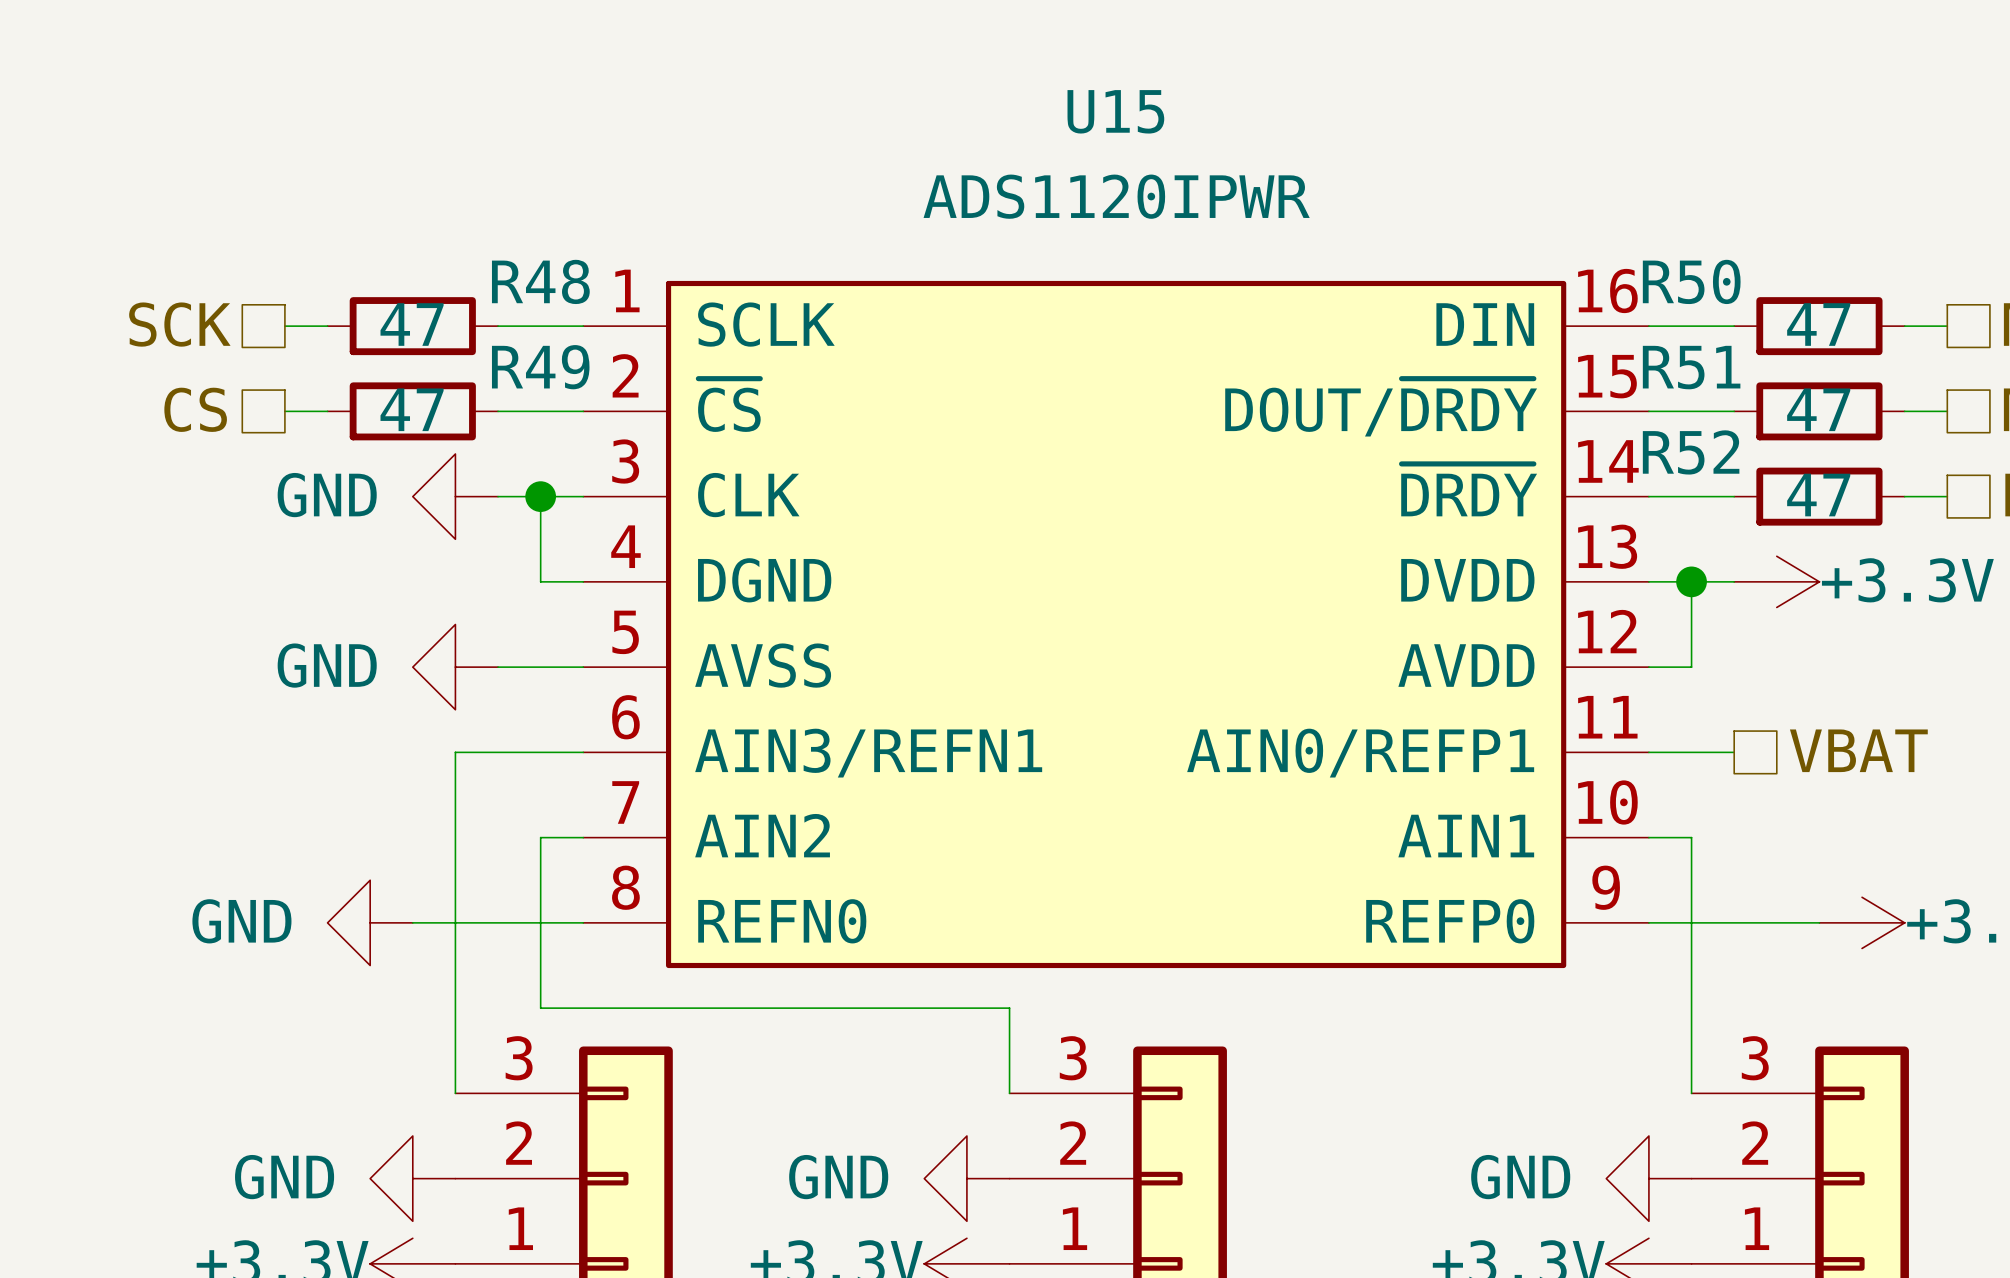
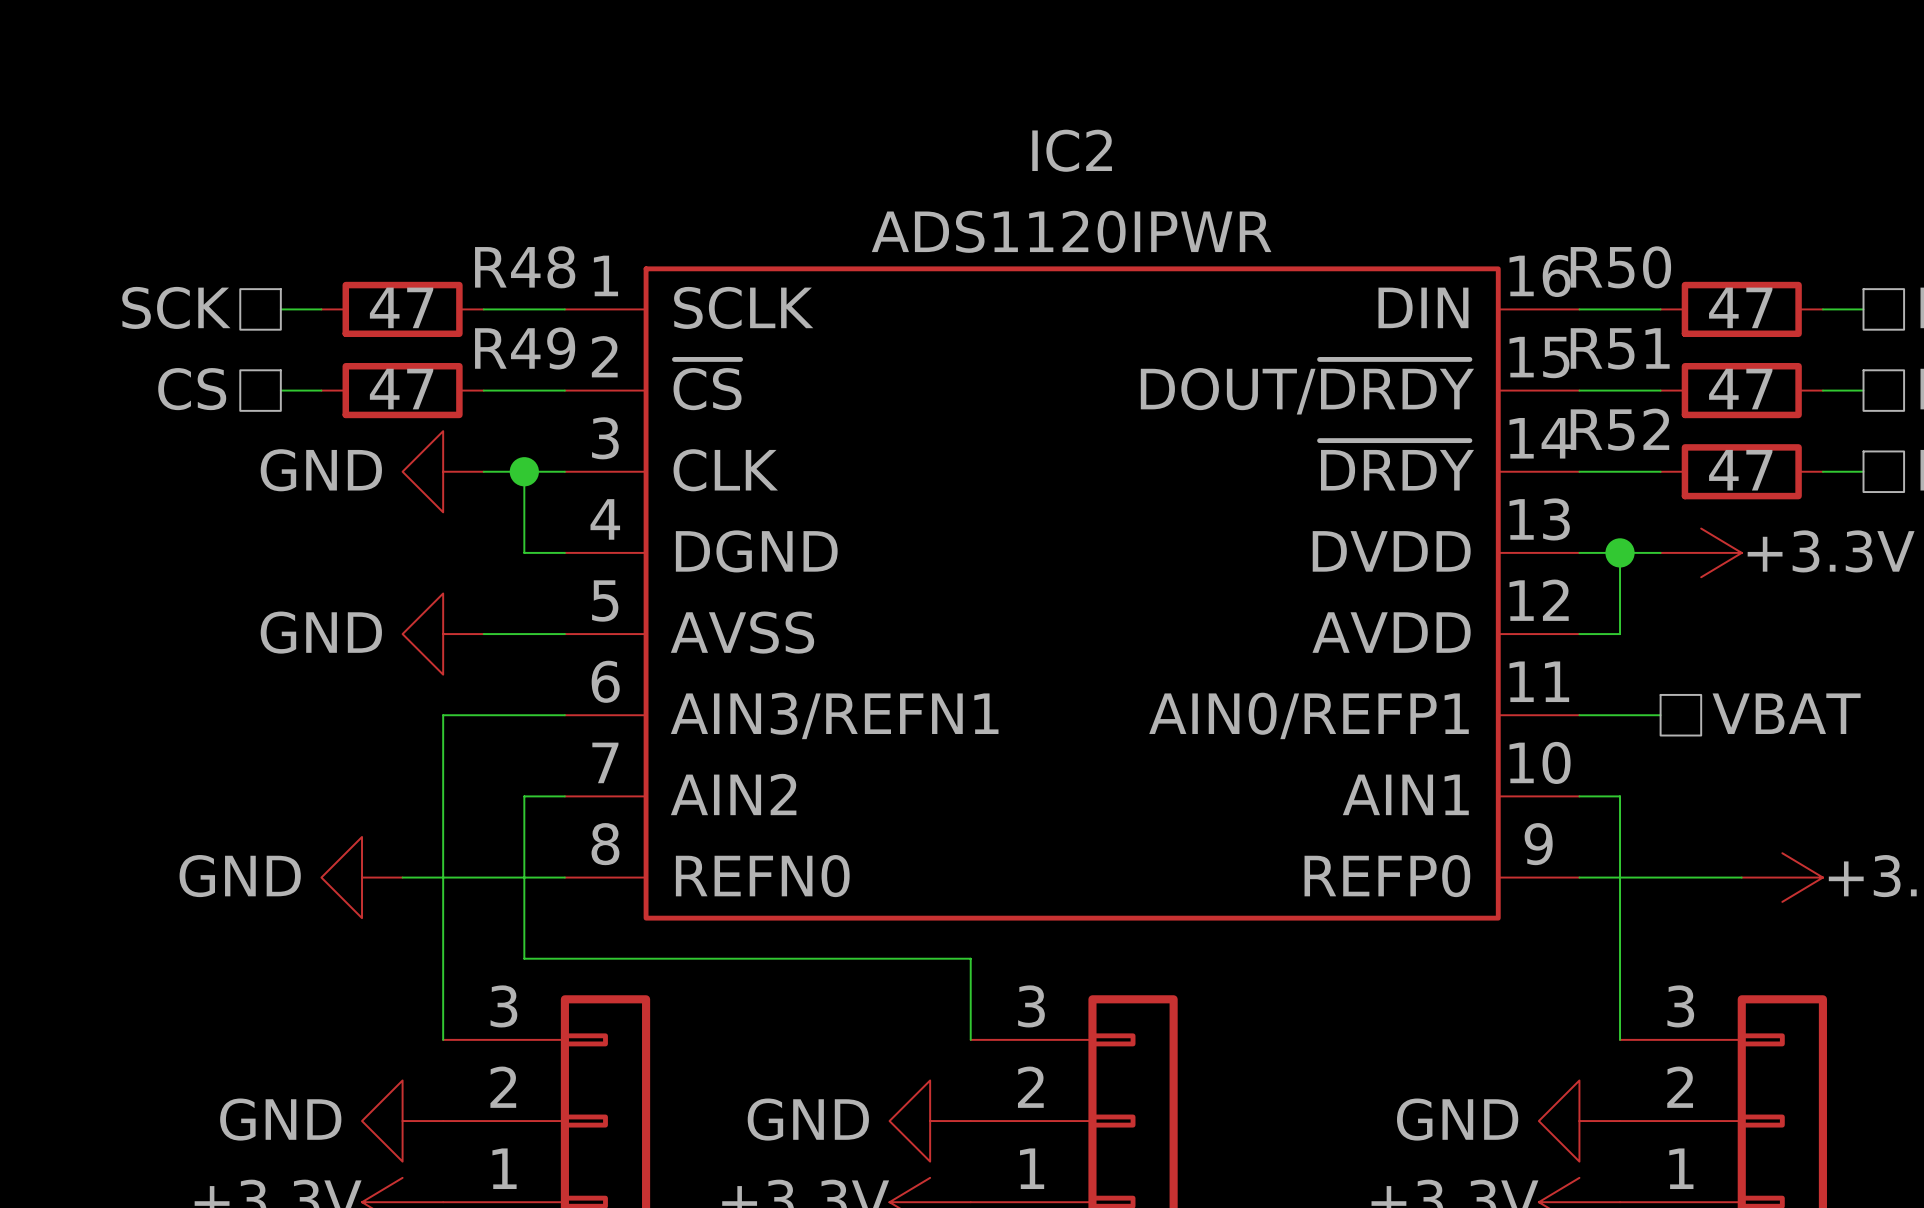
U15 name: U15 (1115, 111) -> IC2 (1072, 150)
U15 value position: ADS1120IPWR (1116, 196) -> ADS1120IPWR (1071, 231)

